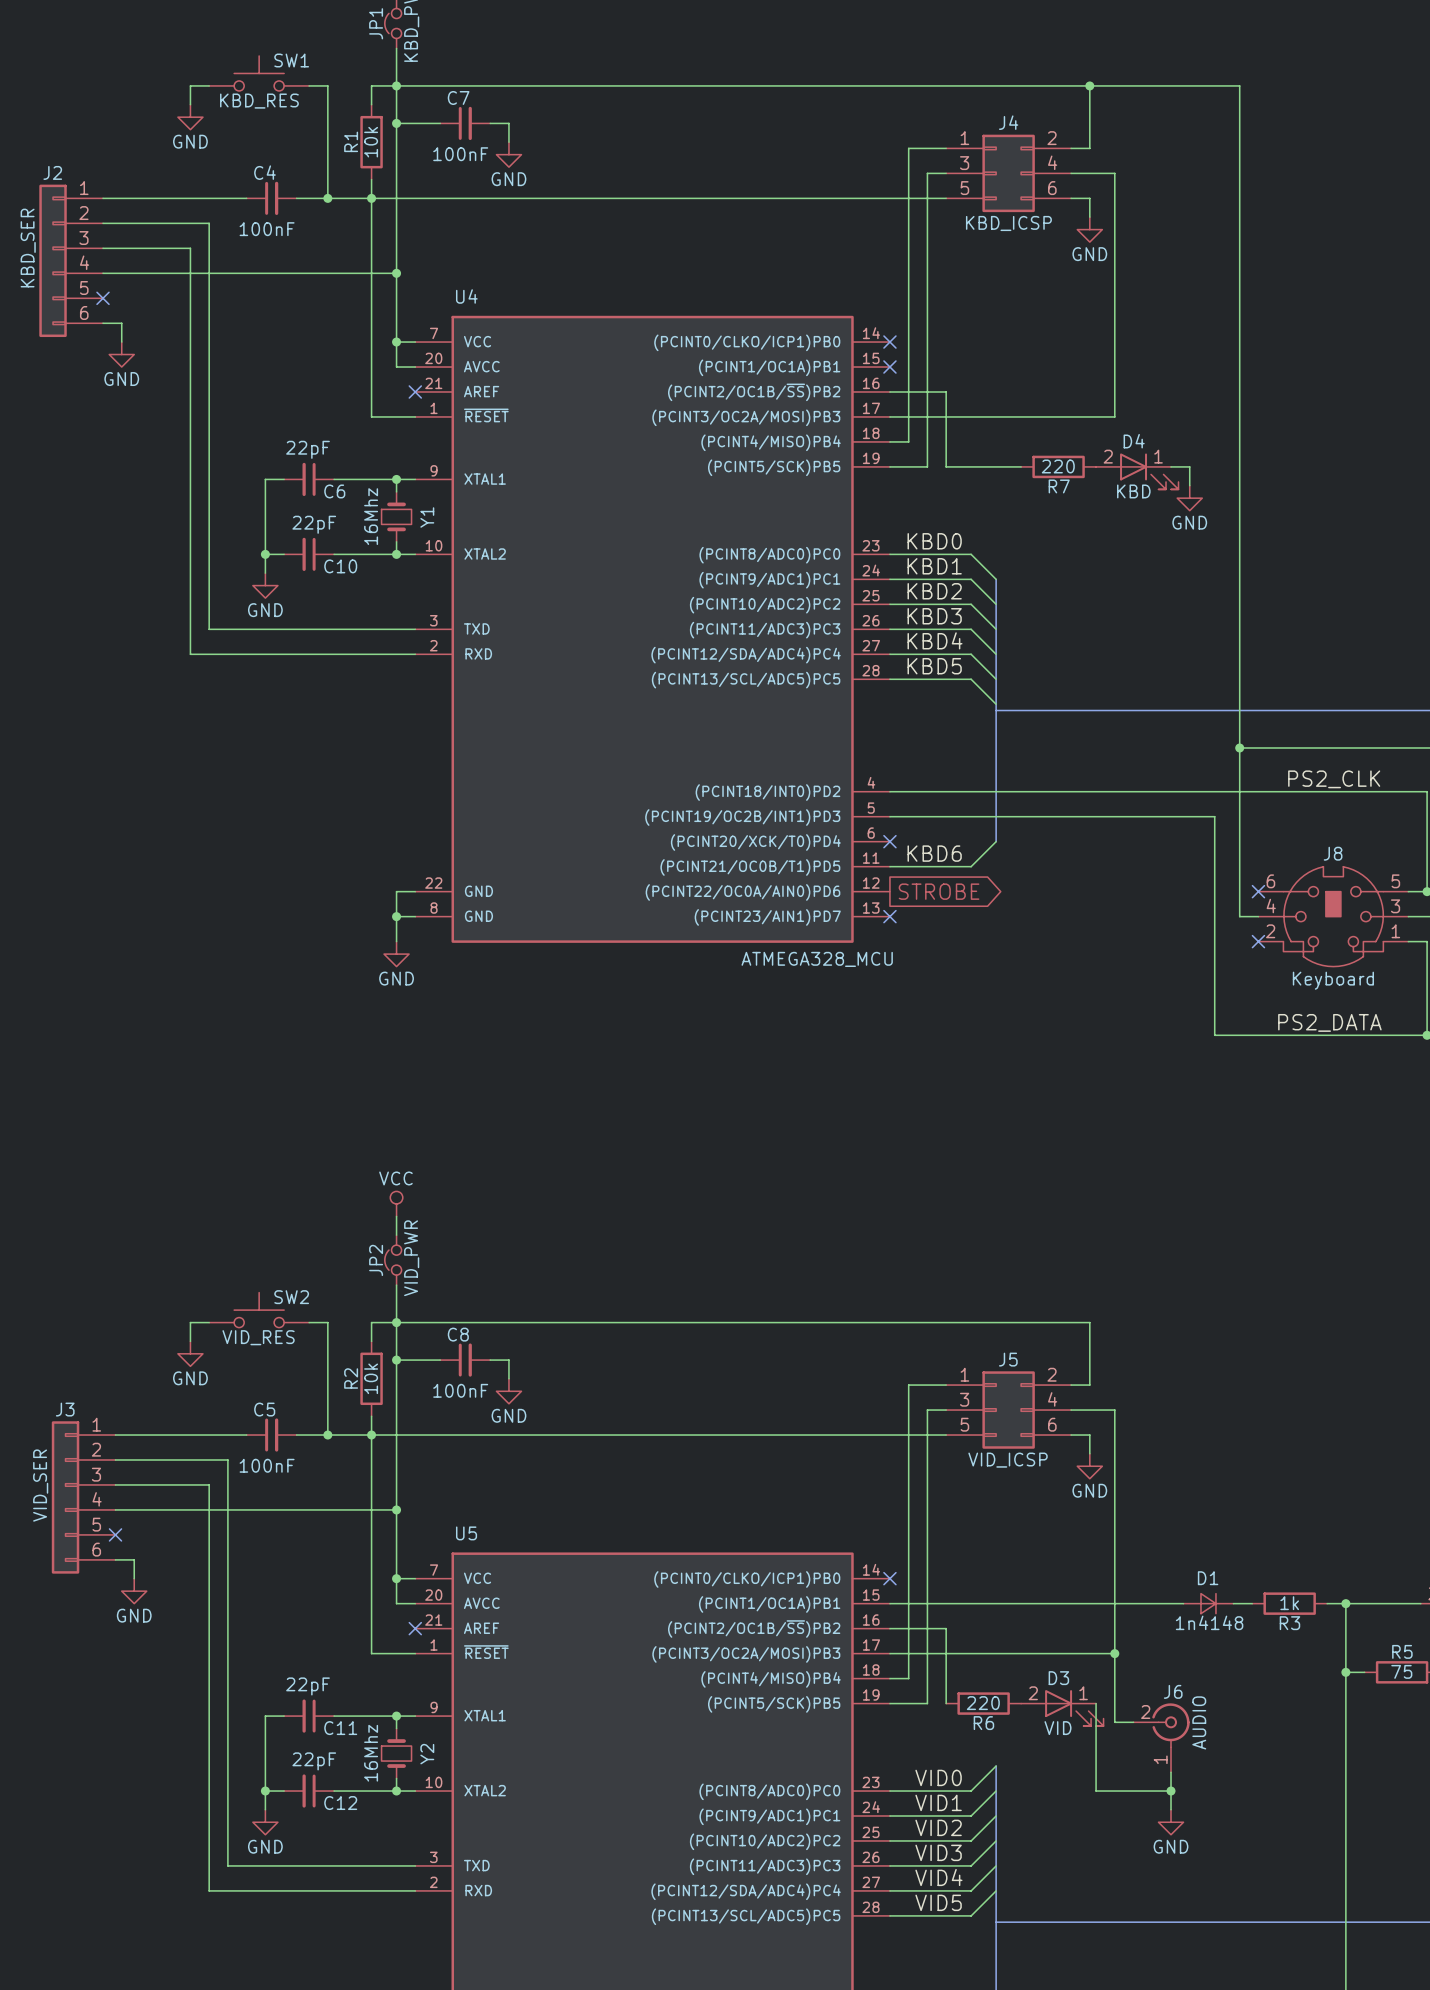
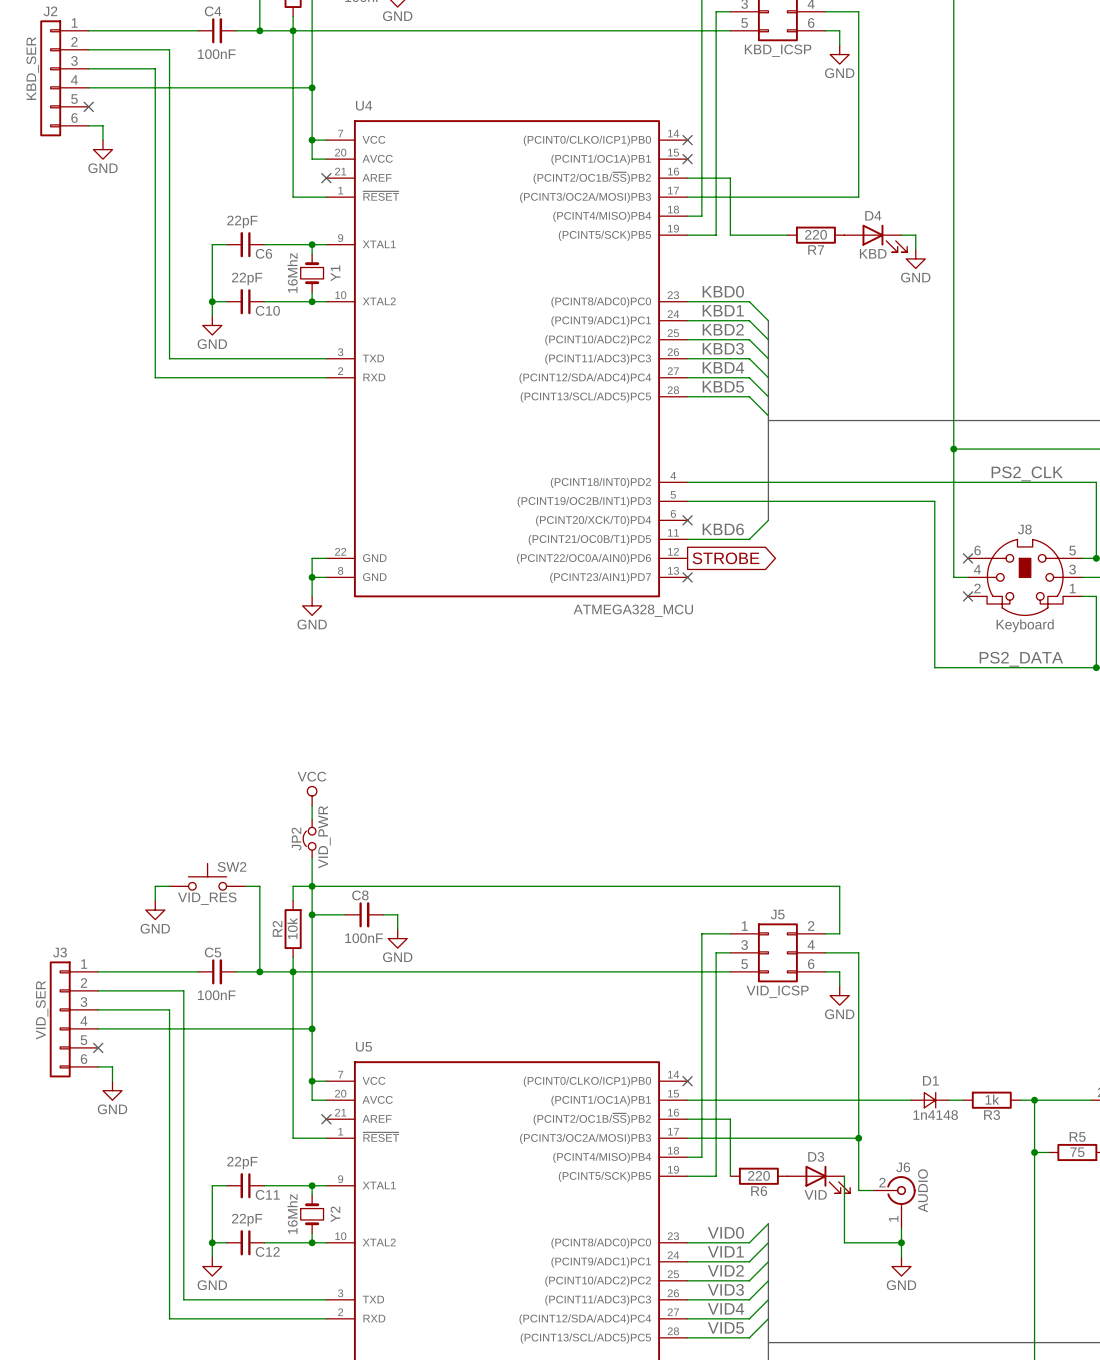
D4 symbol: [1096, 453, 1179, 490] -> [844, 224, 908, 253]
D3 symbol: [1021, 1690, 1104, 1727] -> [787, 1165, 851, 1194]

